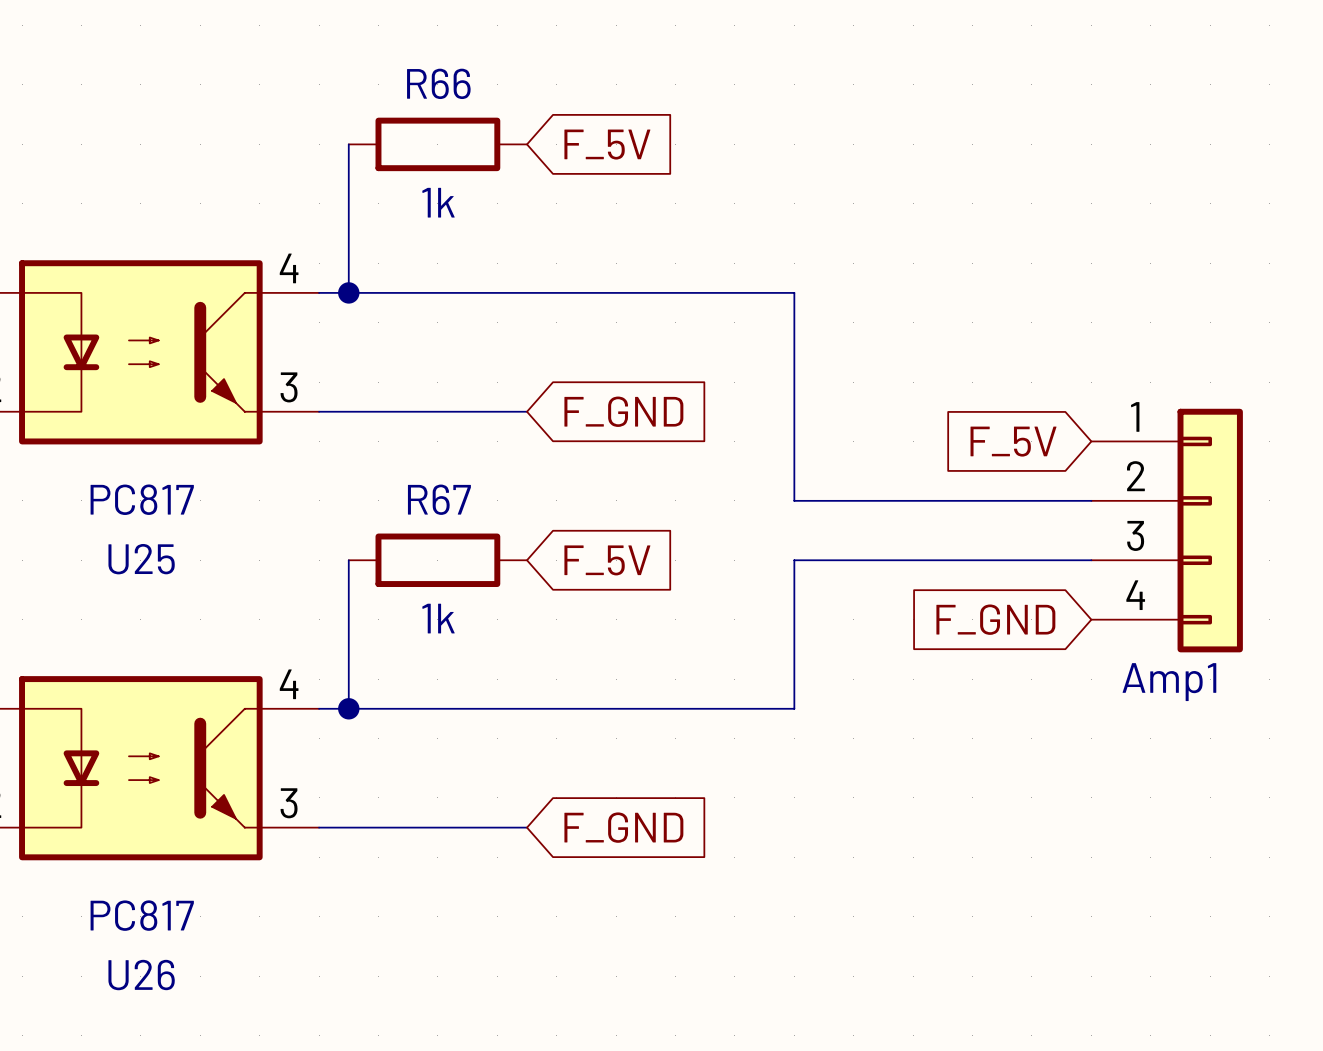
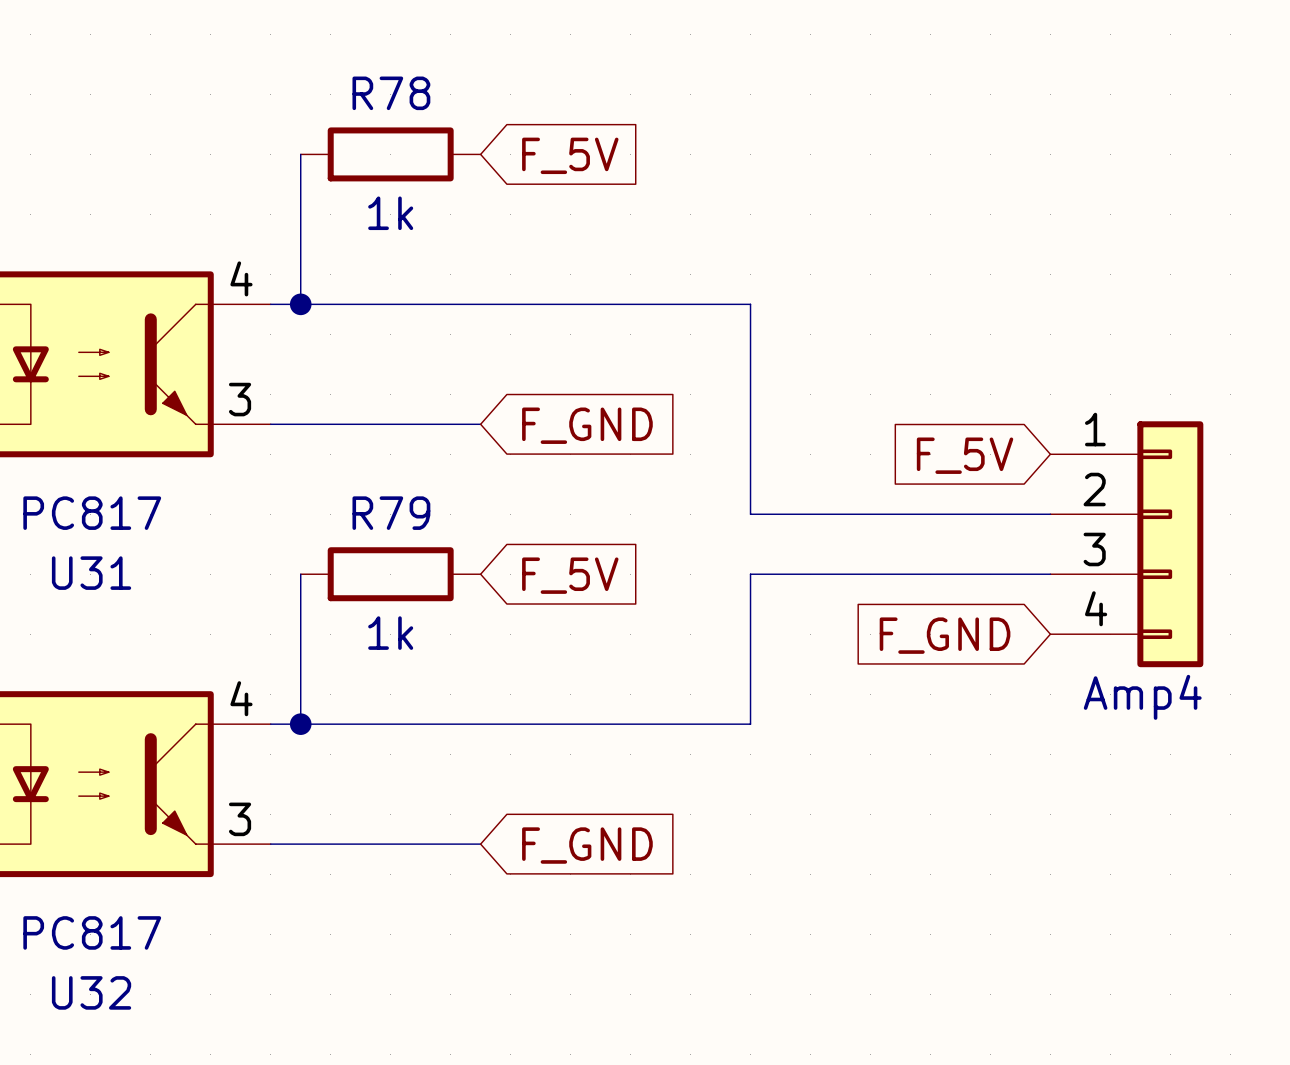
R66 name: R66 (438, 83) -> R78 (391, 93)
R67 name: R67 (439, 499) -> R79 (391, 513)
U25 name: U25 (141, 559) -> U31 (91, 573)
Amp1 name: Amp1 (1169, 682) -> Amp4 (1142, 697)
U26 name: U26 (141, 975) -> U32 (91, 992)

